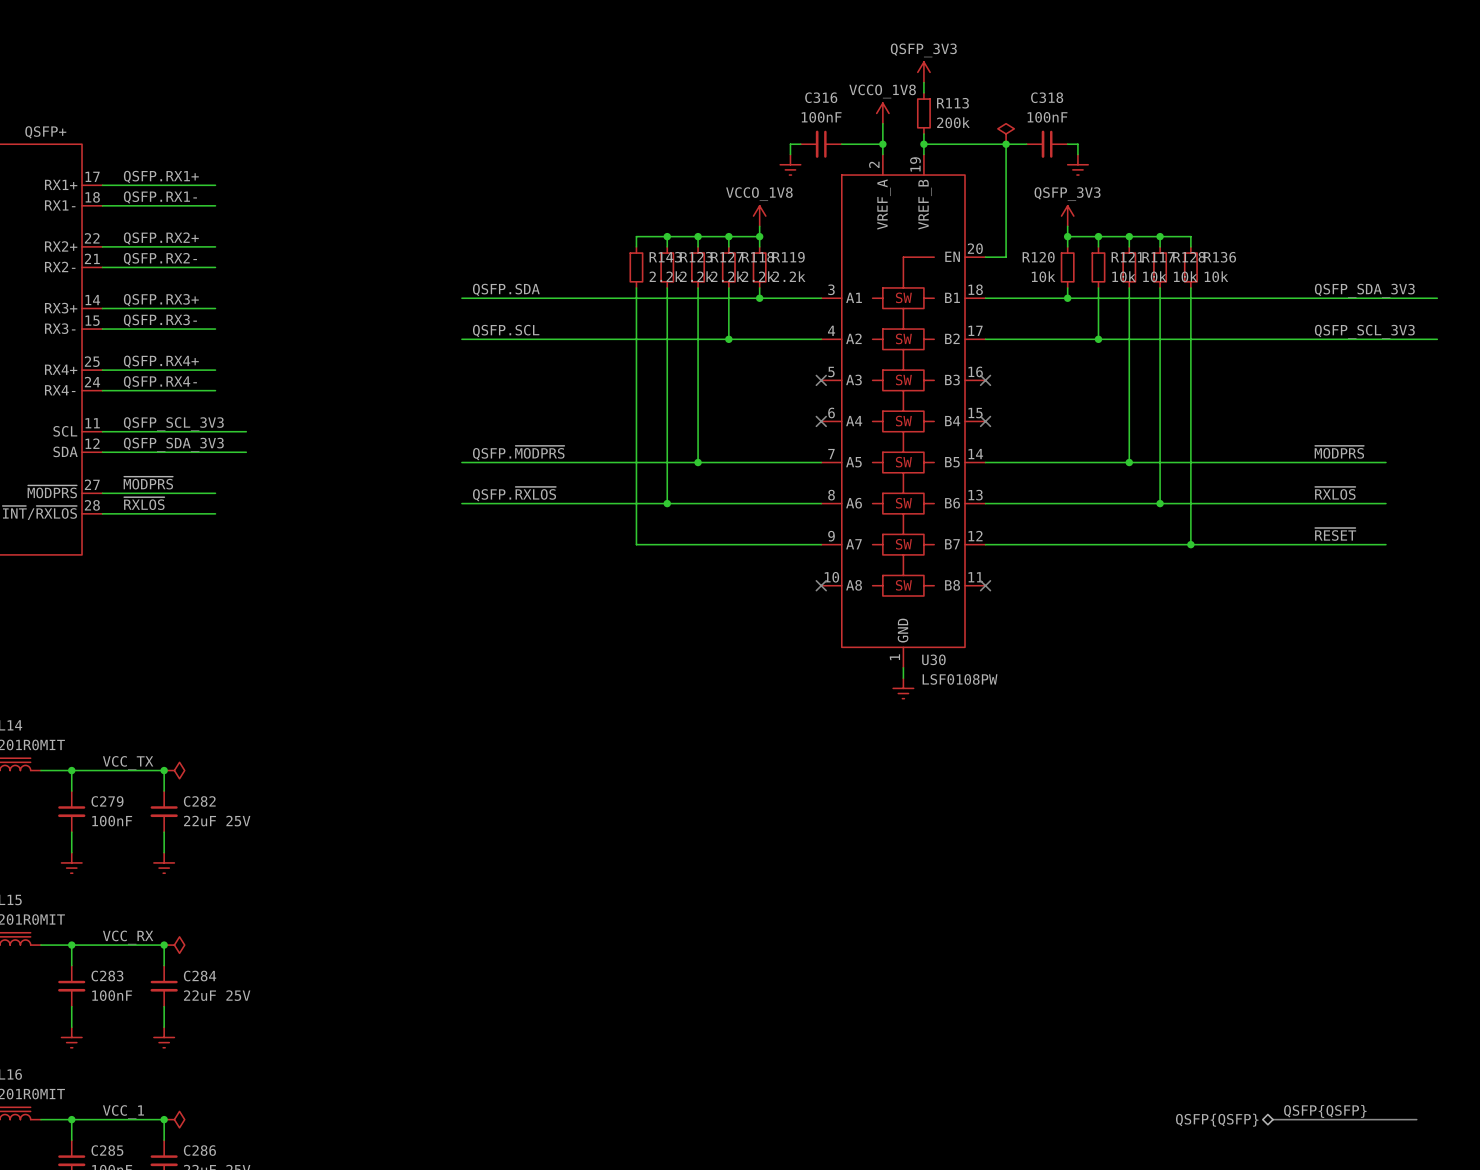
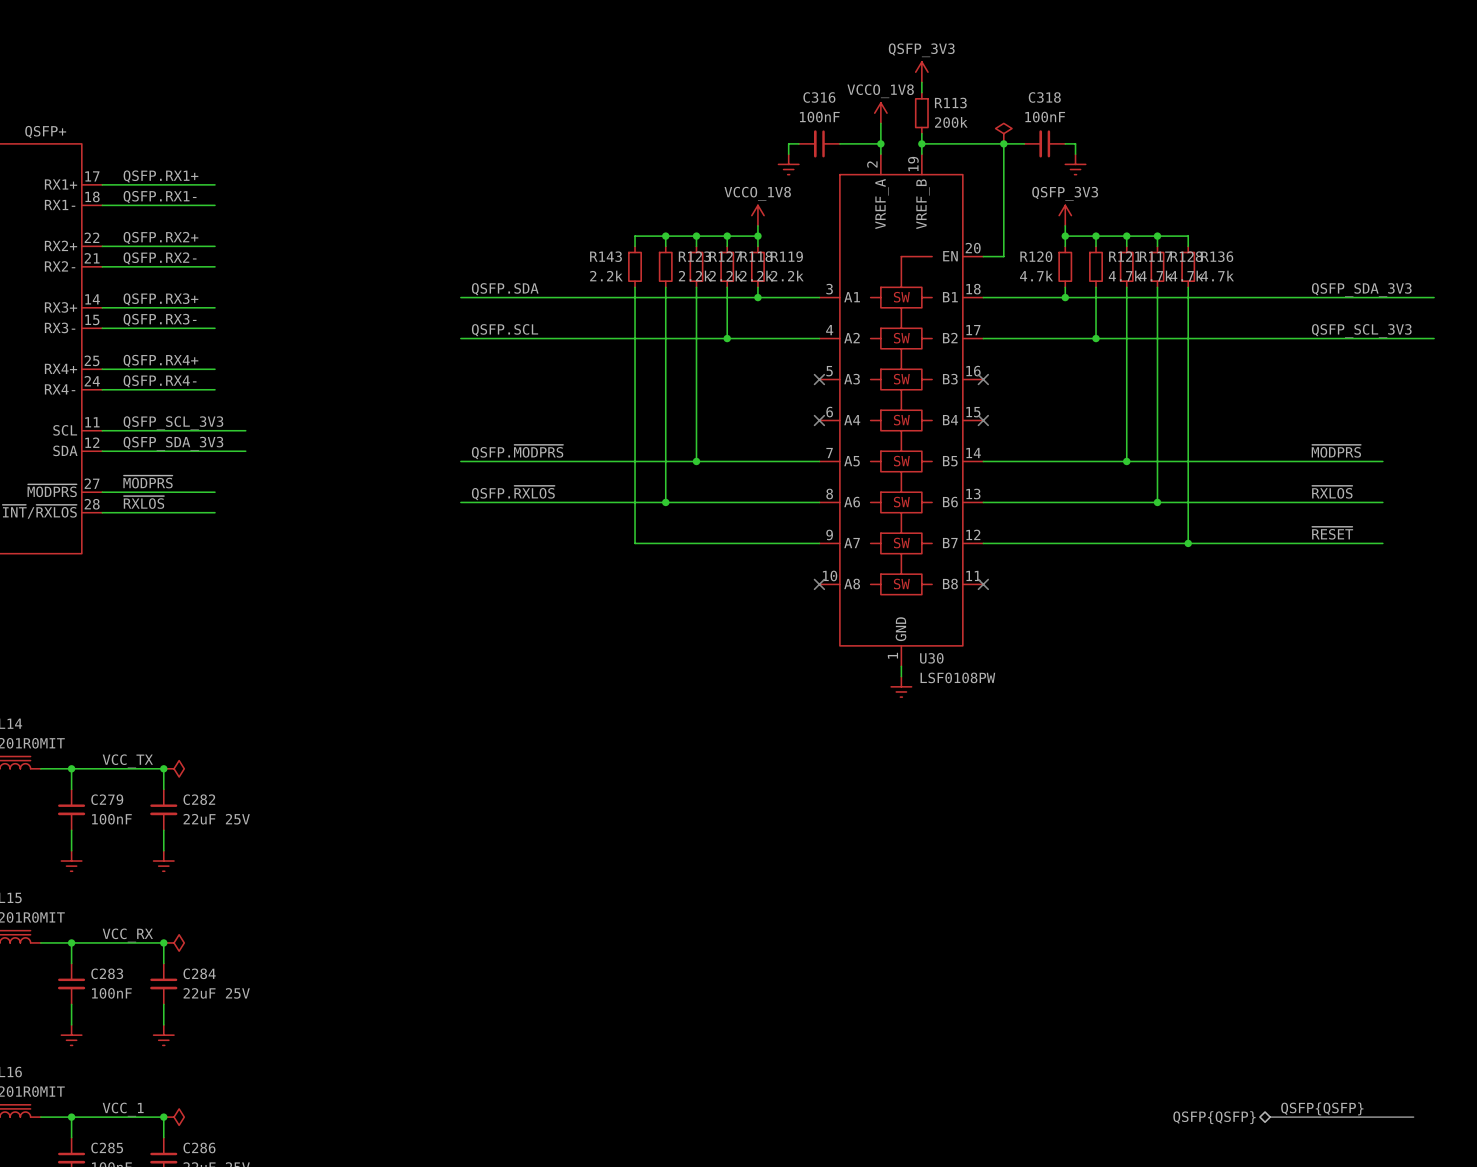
R143 name position: R143 (665, 257) -> R143 (605, 256)
R143 value position: 2.2k (665, 276) -> 2.2k (606, 276)
R120 value: 10k (1043, 276) -> 4.7k (1036, 276)
R121 value: 10k (1124, 276) -> 4.7k (1125, 276)
R117 value: 10k (1154, 276) -> 4.7k (1156, 276)
R128 value: 10k (1185, 276) -> 4.7k (1186, 276)
R136 value: 10k (1216, 276) -> 4.7k (1217, 276)

